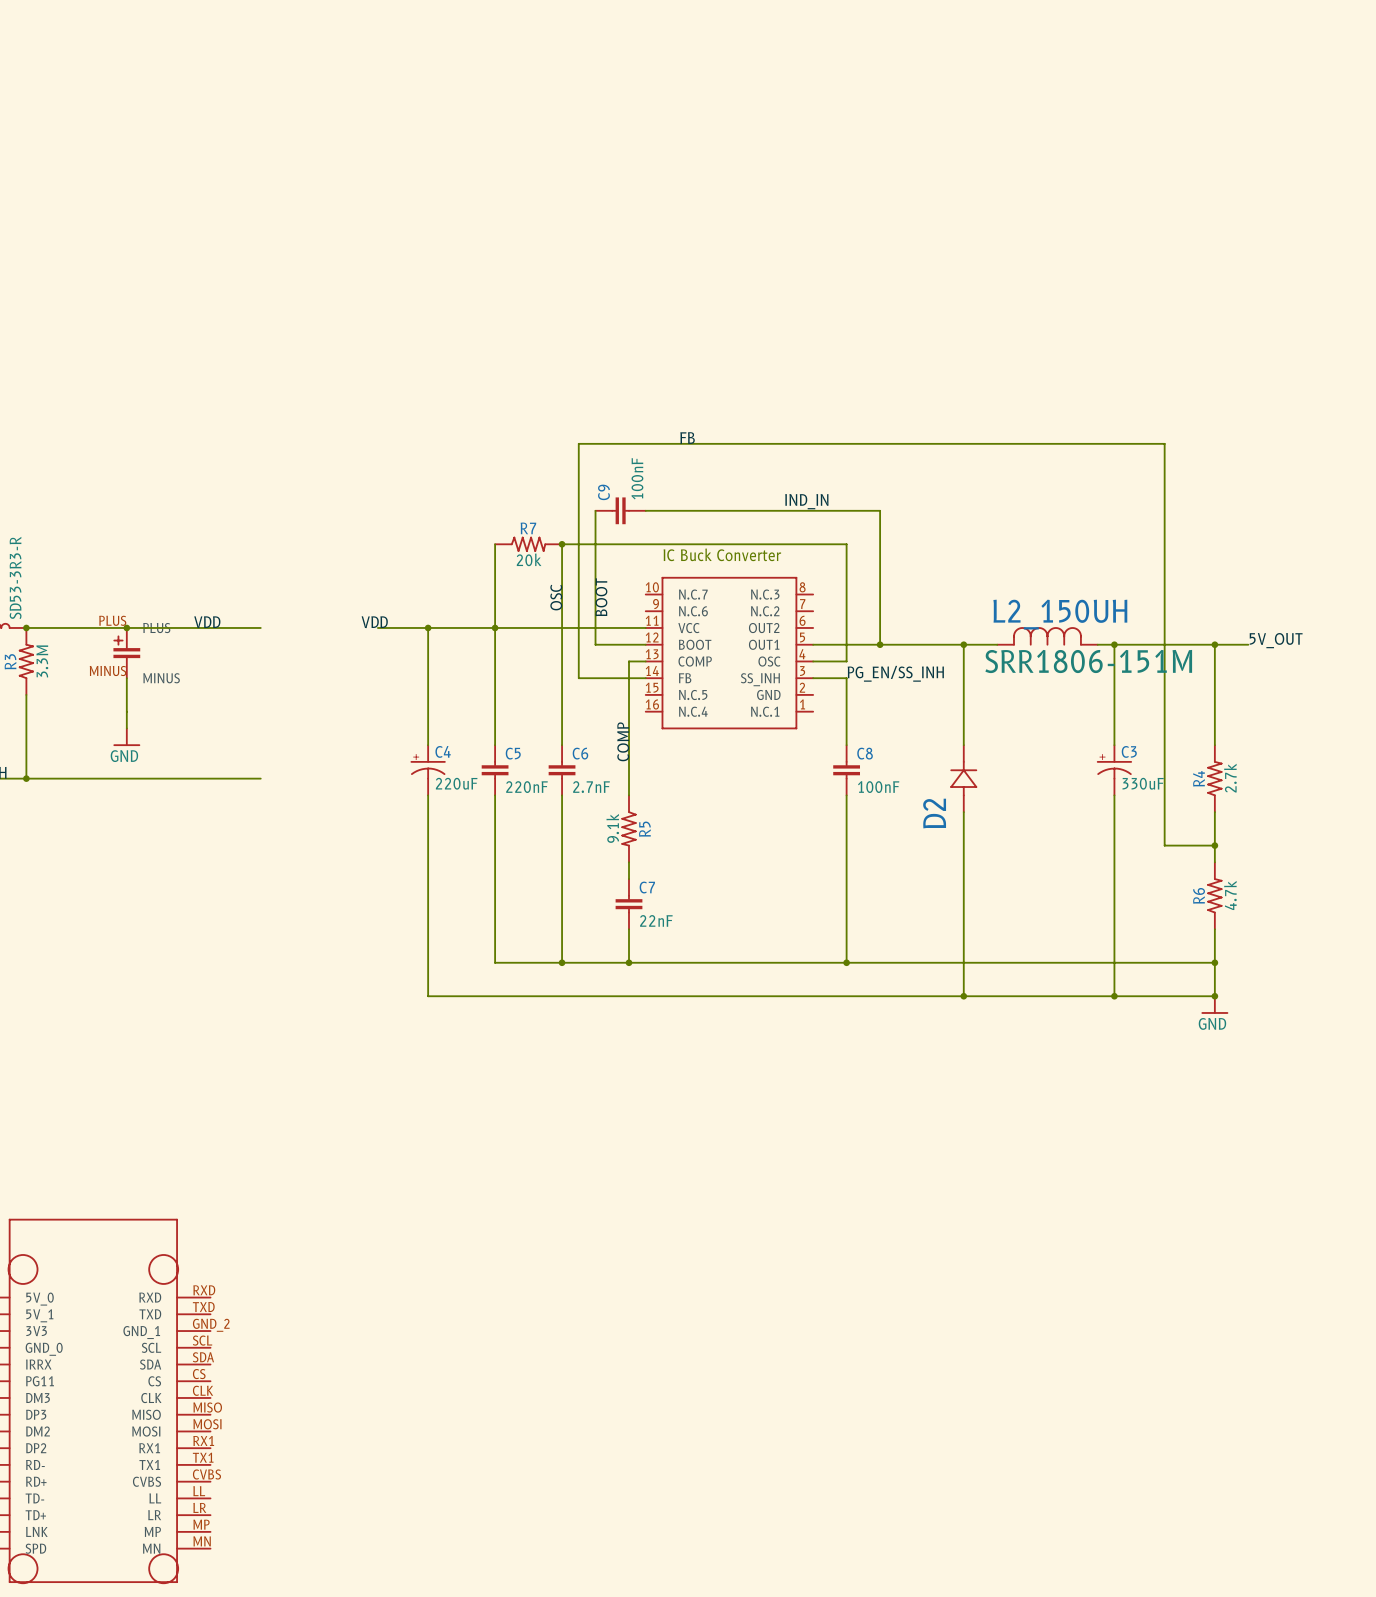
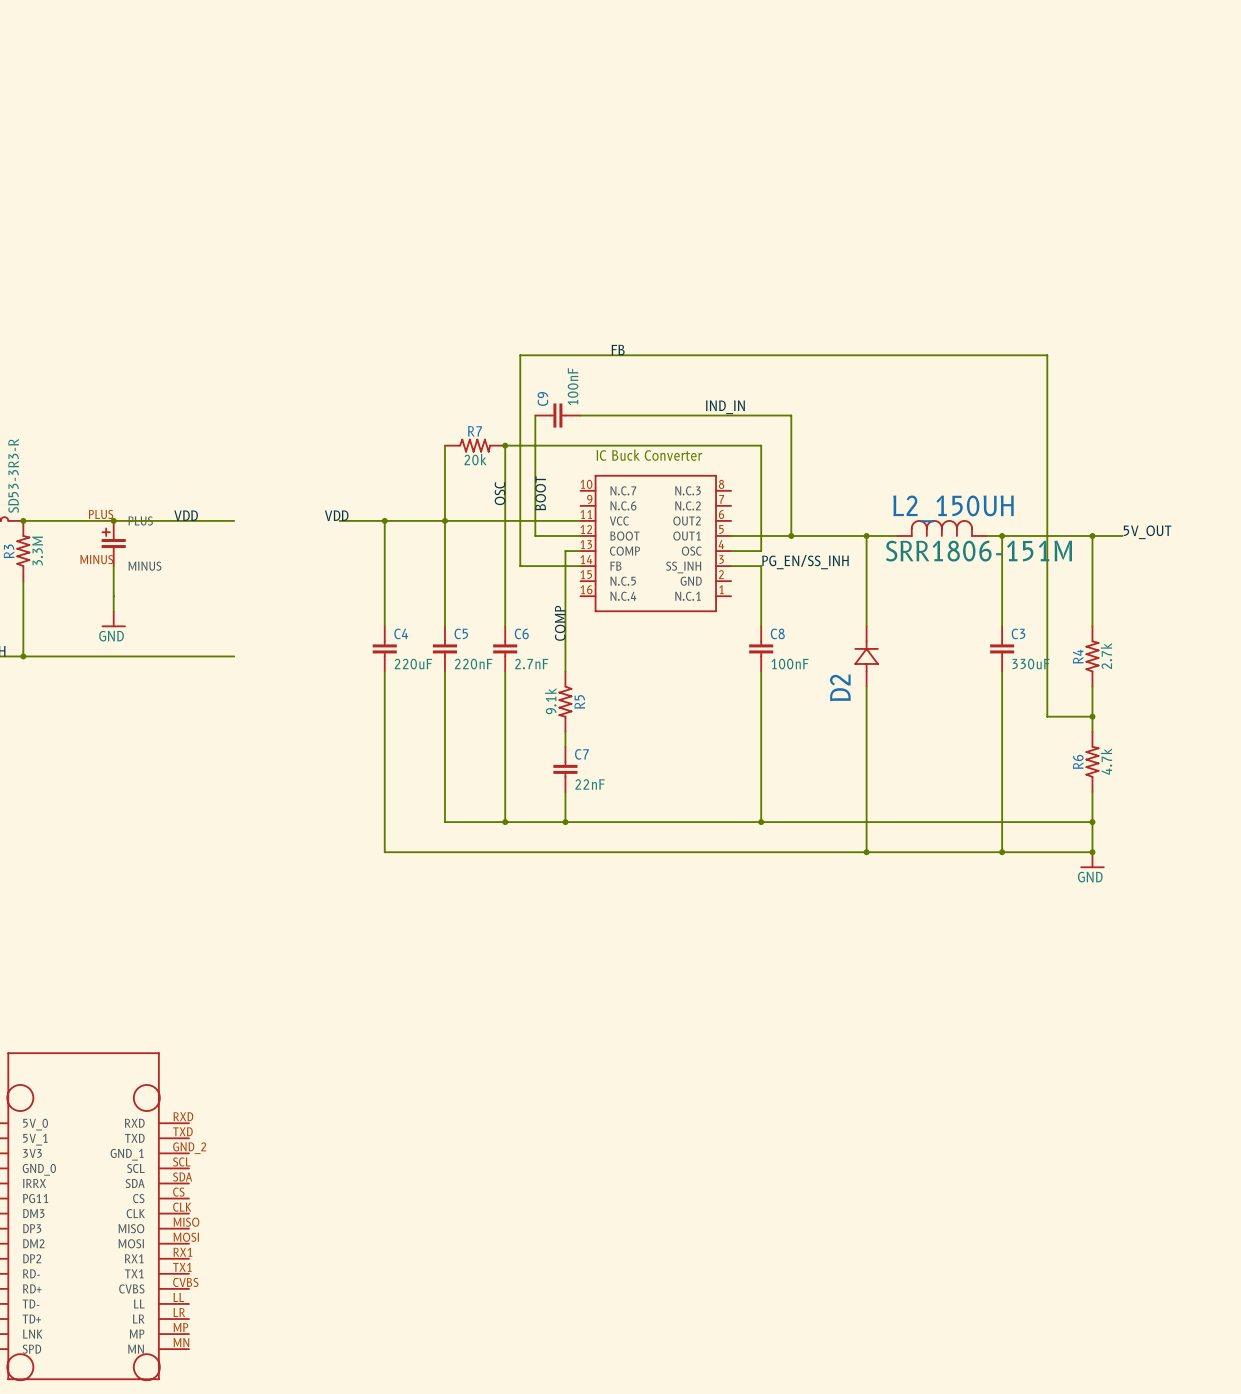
C4 symbol: [410, 745, 446, 796] -> [372, 626, 397, 672]
C3 symbol: [1096, 745, 1133, 796] -> [990, 626, 1015, 672]
C4 value: none -> 220uF (413, 664)
C3 value: none -> 330uF (1030, 664)

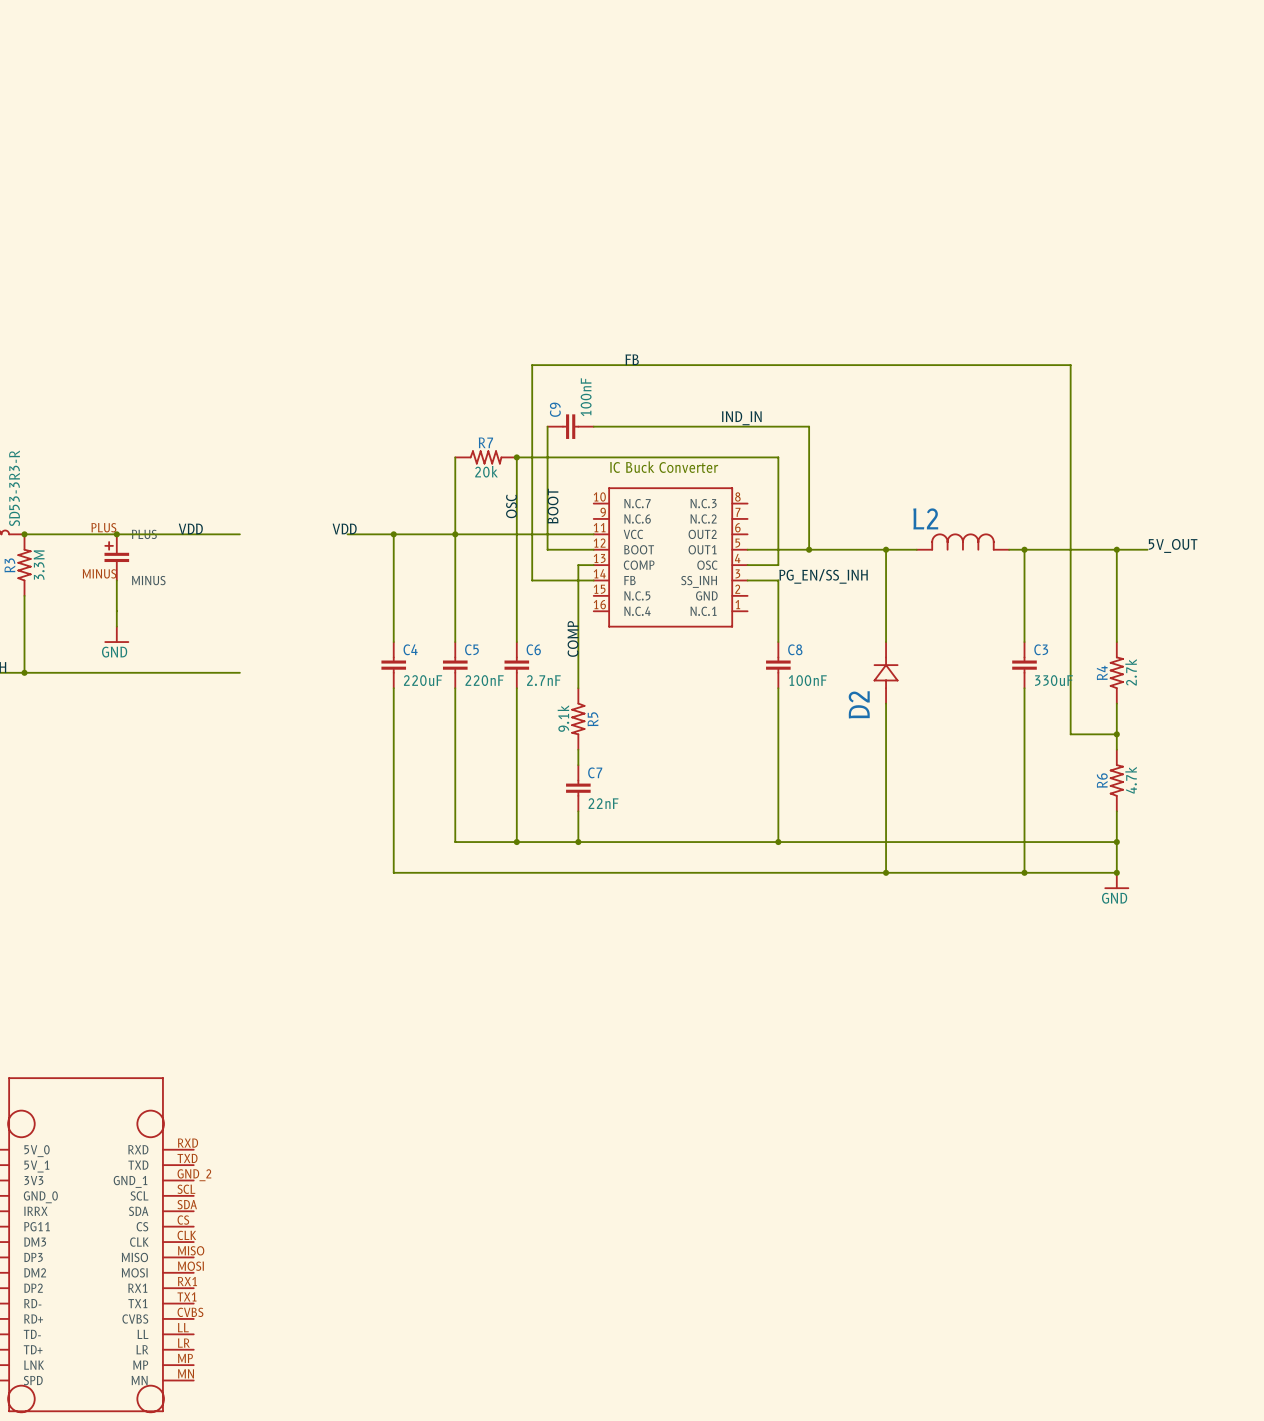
L2_150UH name: L2_150UH (953, 508) -> L2 (925, 518)
L2_150UH value: SRR1806-151M (978, 551) -> none

